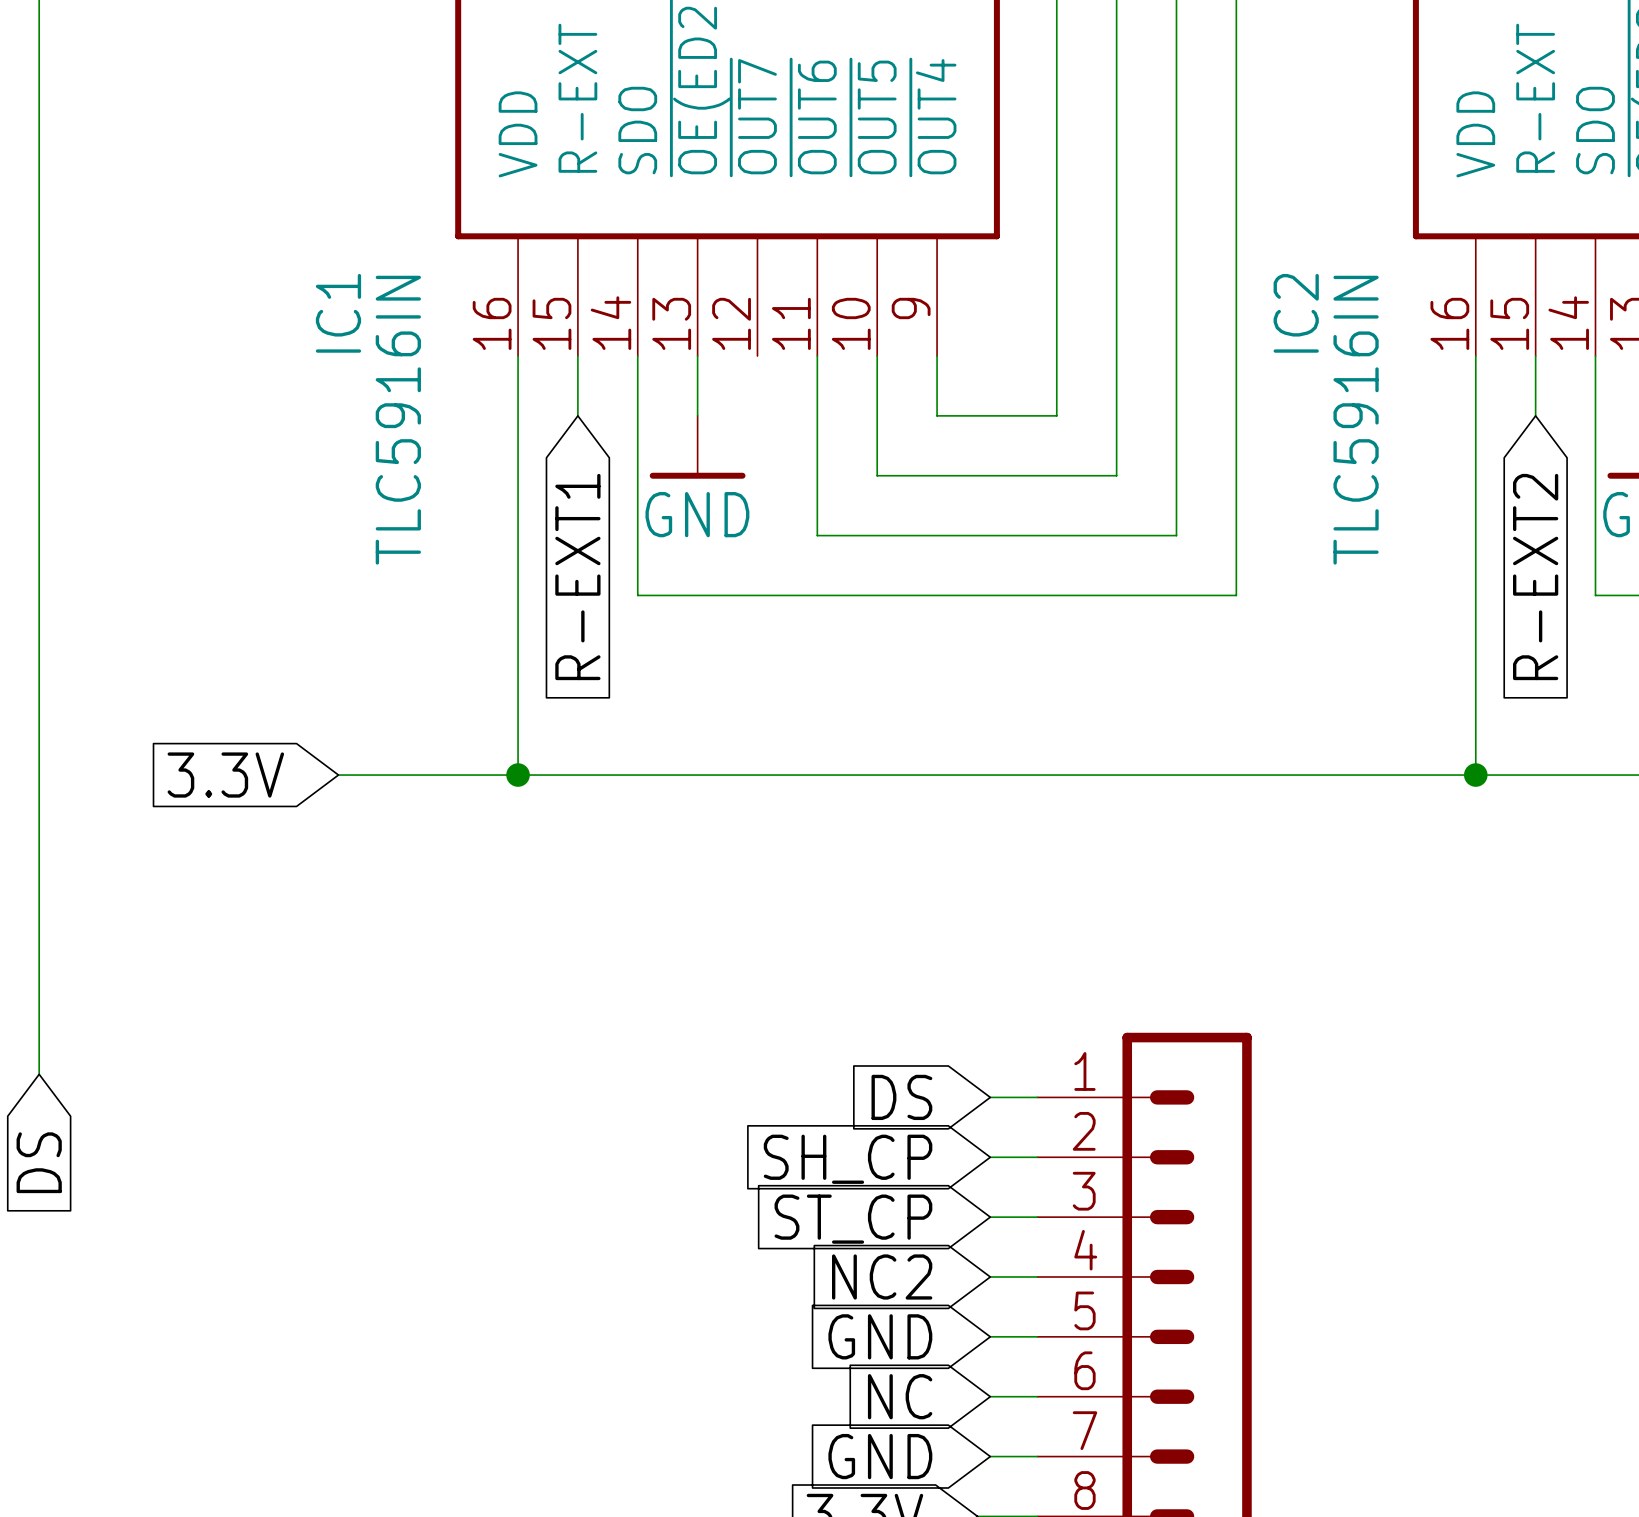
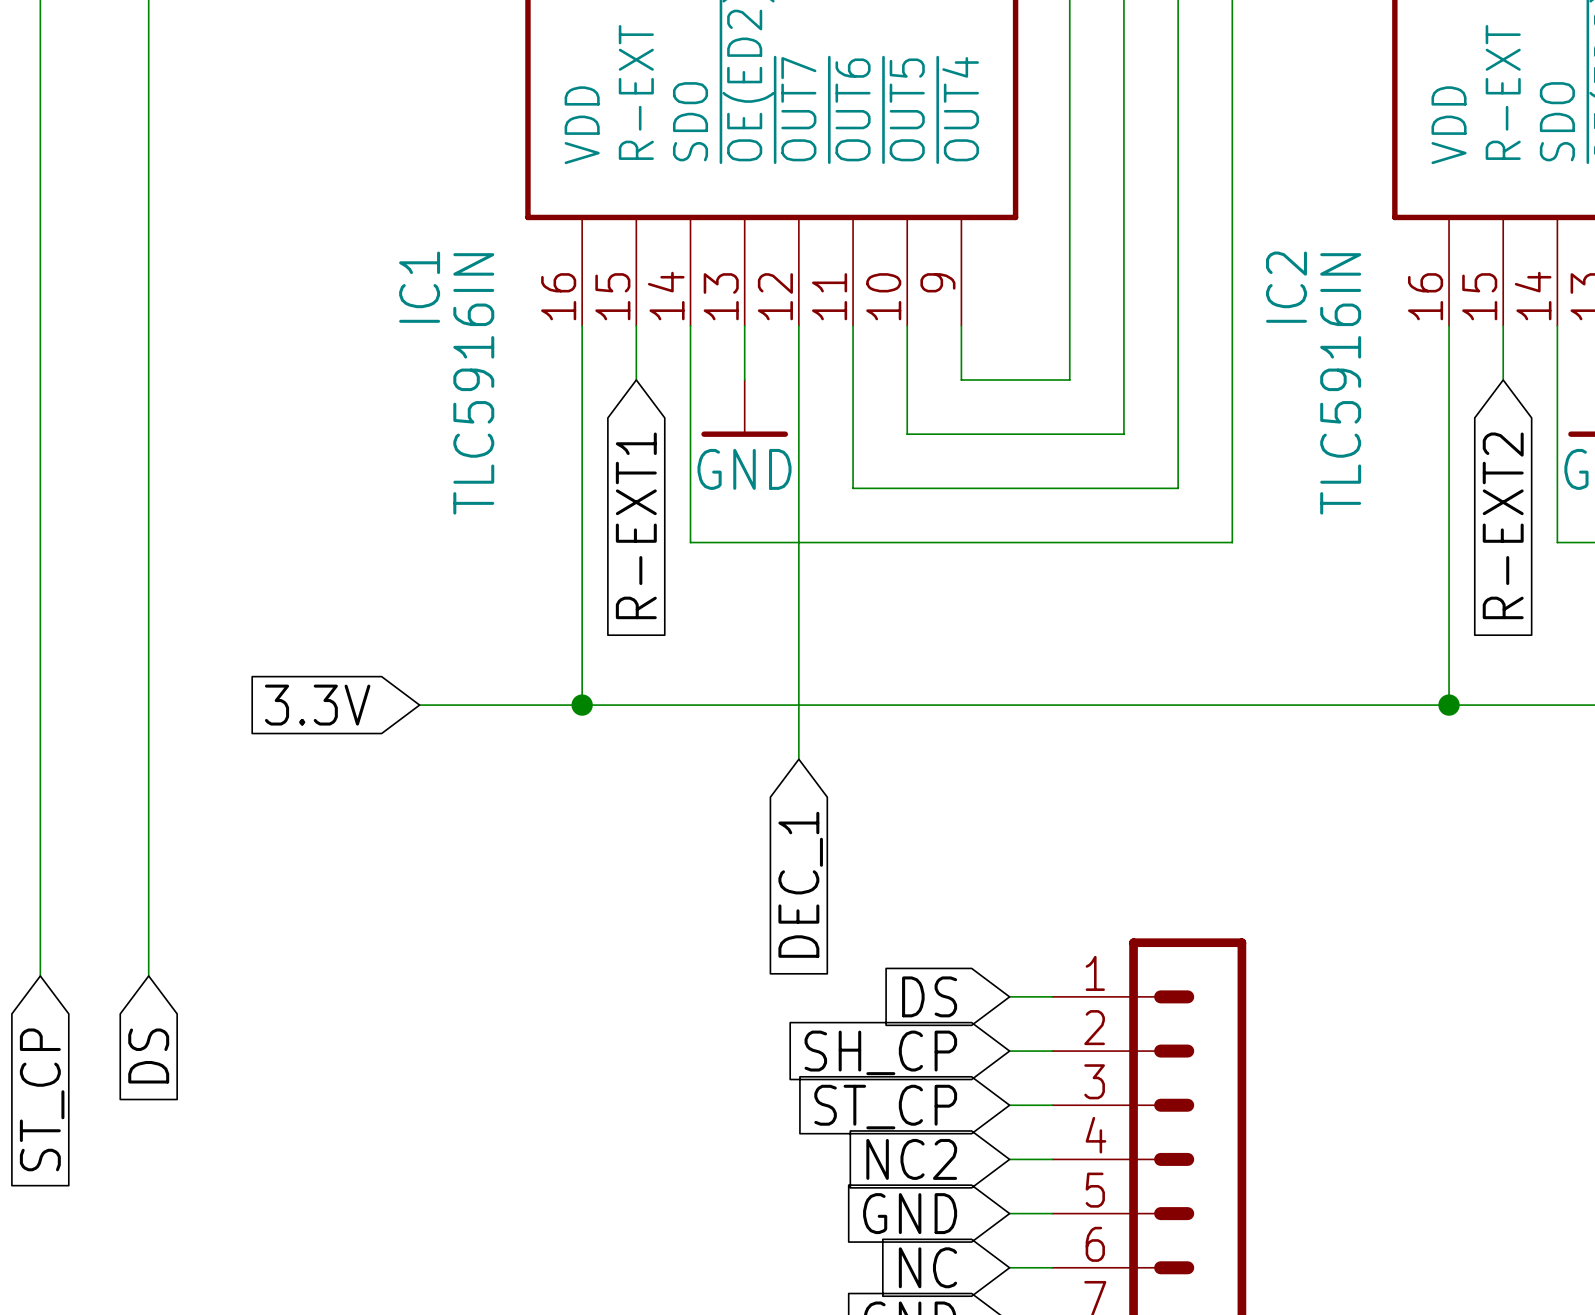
wire: none -> (798, 325) (798, 759)
global label: none -> DEC_1 (800, 884)

